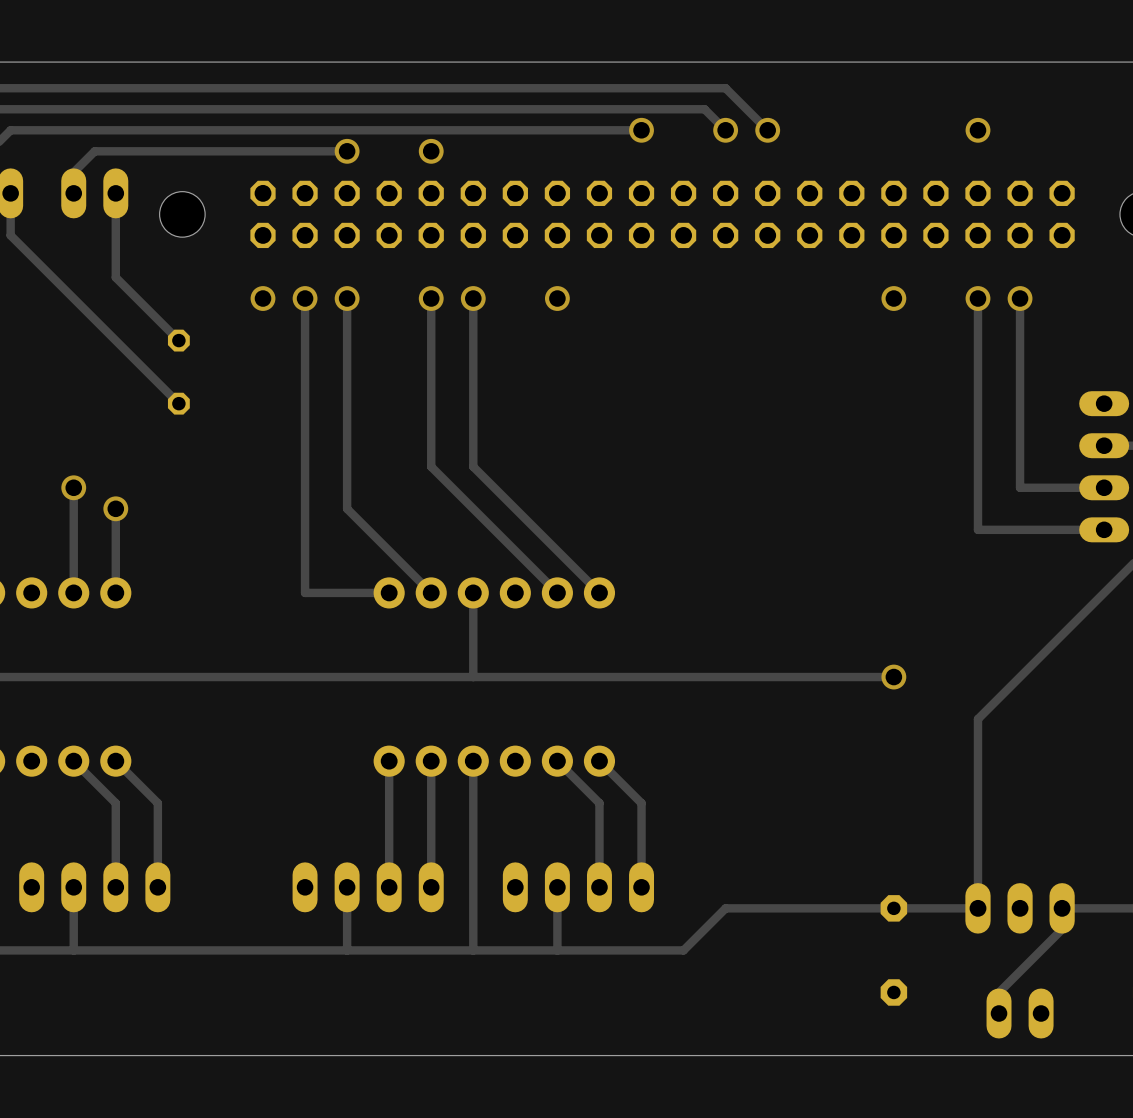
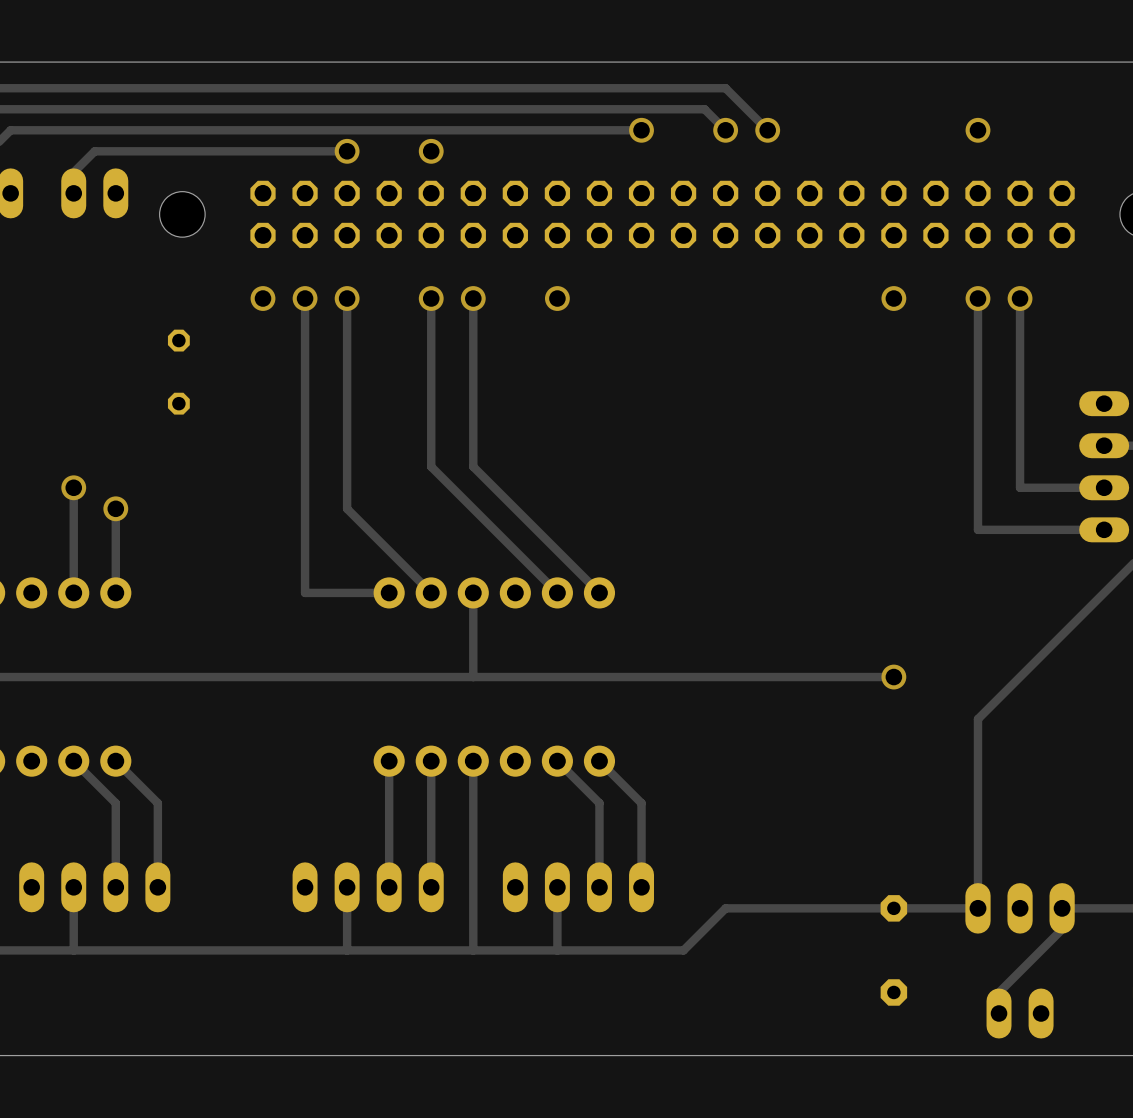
track: (10, 193) (10, 235) (178, 403) -> none
track: (115, 193) (115, 277) (178, 340) -> none

